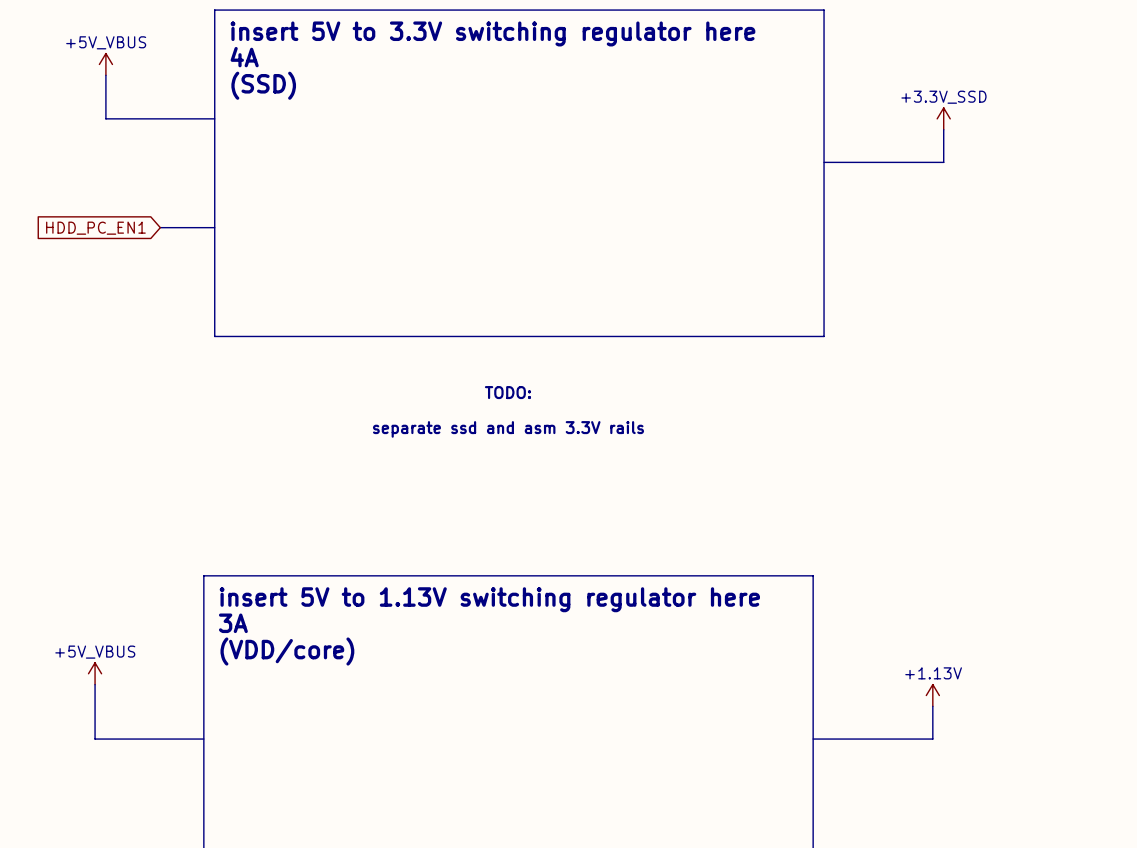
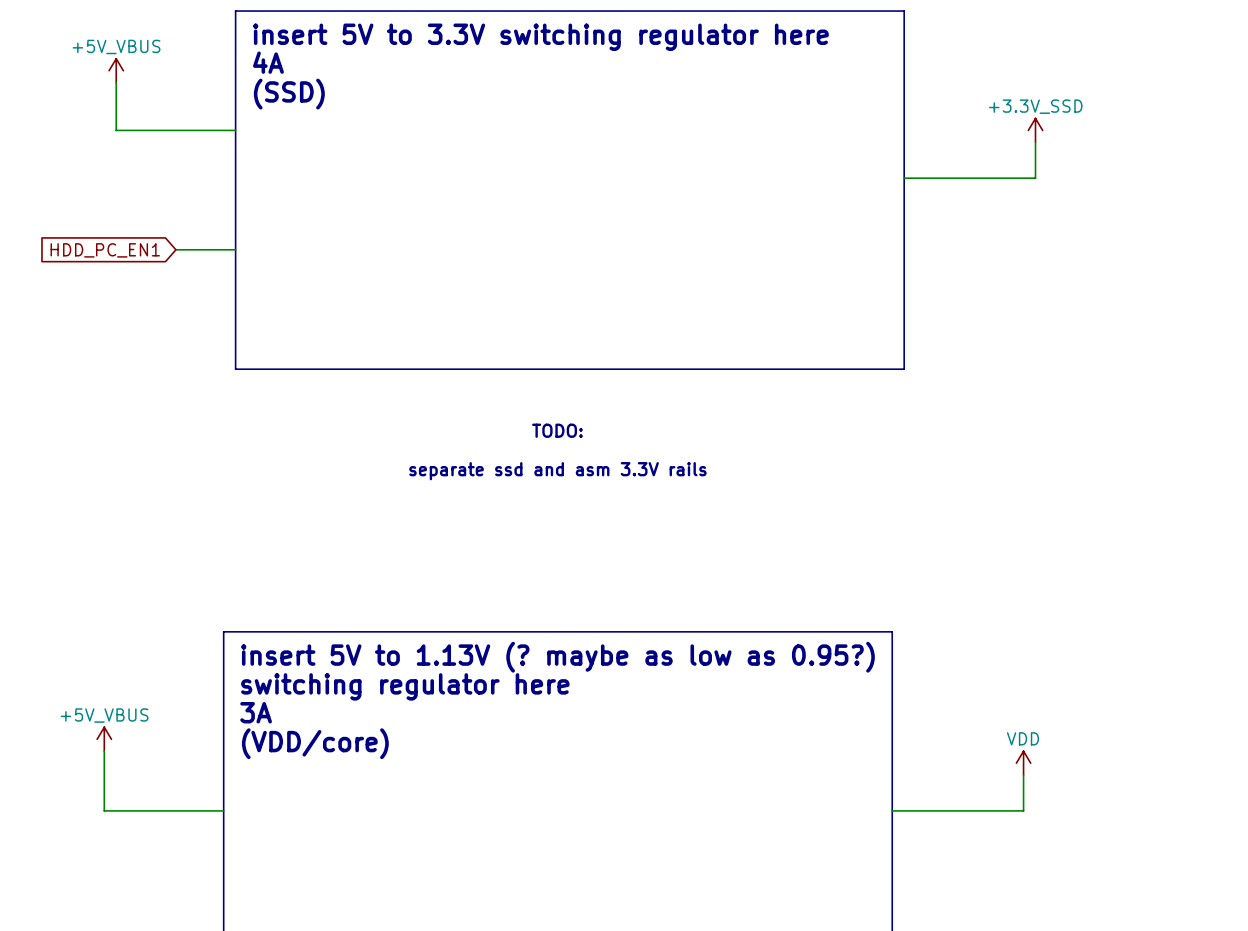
text: insert 5V to 1.13V switching regulator here (489, 599) -> insert 5V to 1.13V (? maybe as low as 0.95?) (557, 657)
text: 3A (233, 623) -> switching regulator here (405, 686)
text: (VDD/core) (287, 651) -> 3A (256, 712)
text: none -> (VDD/core) (315, 743)
power symbol: +1.13V (932, 695) -> VDD (1023, 763)

